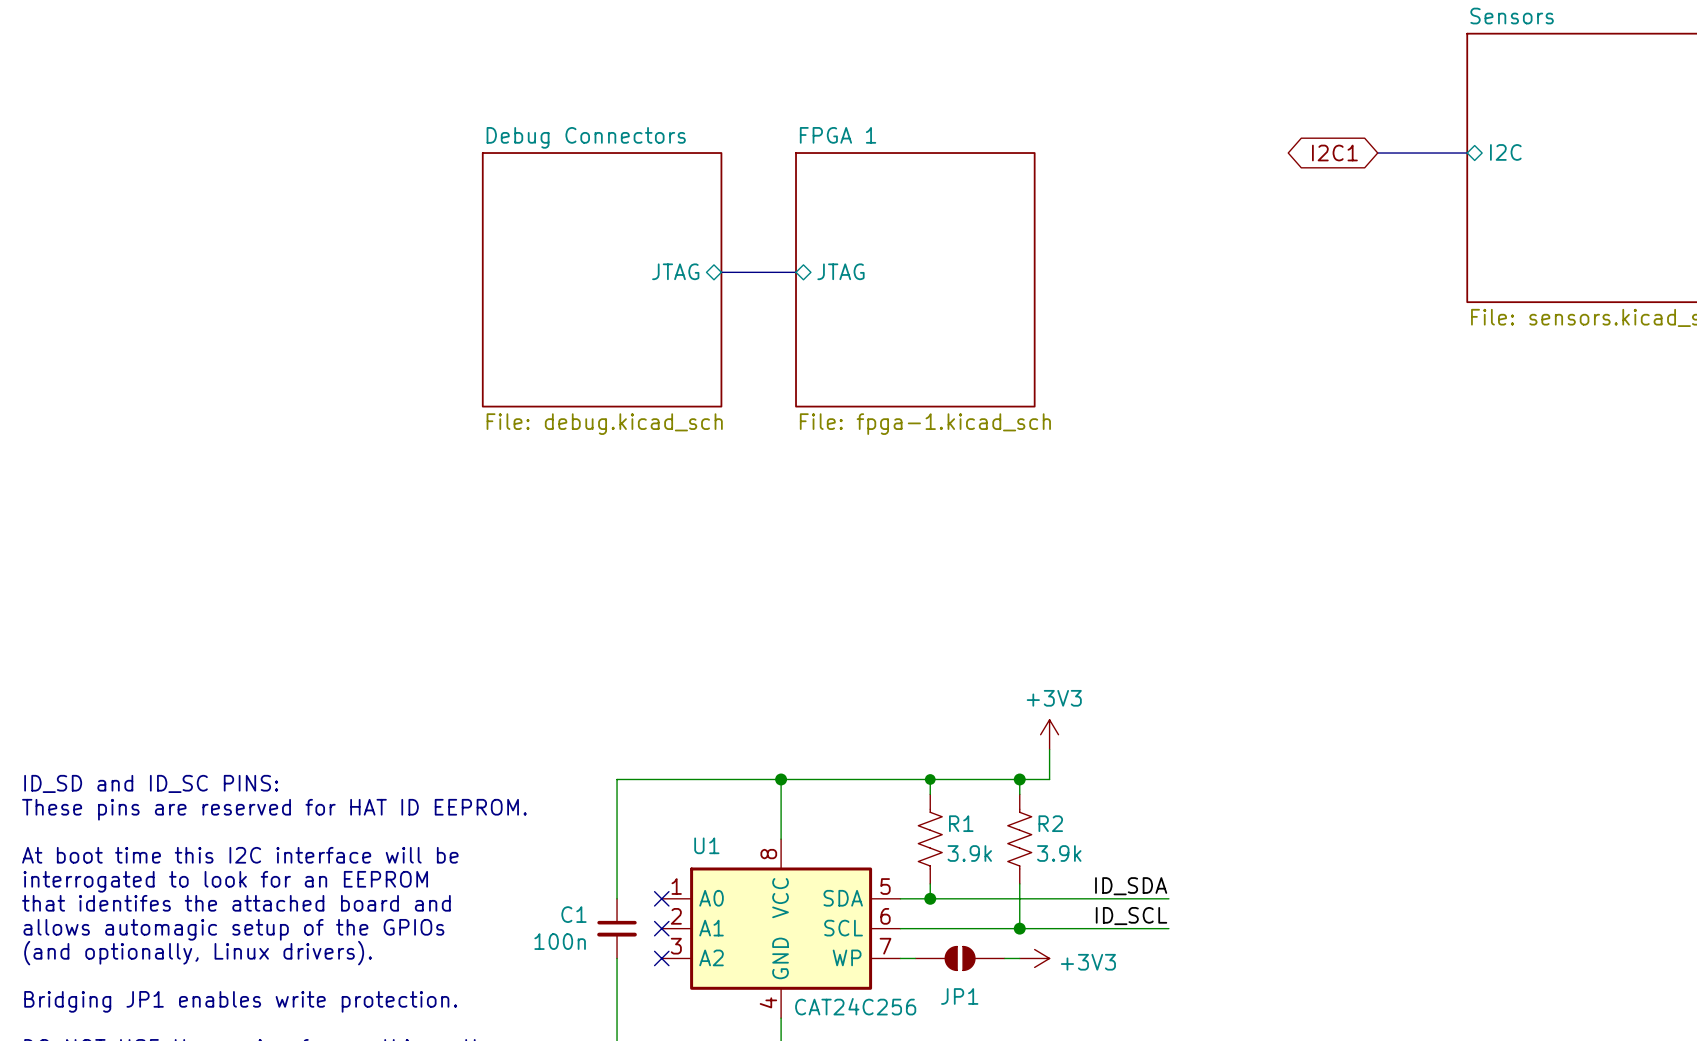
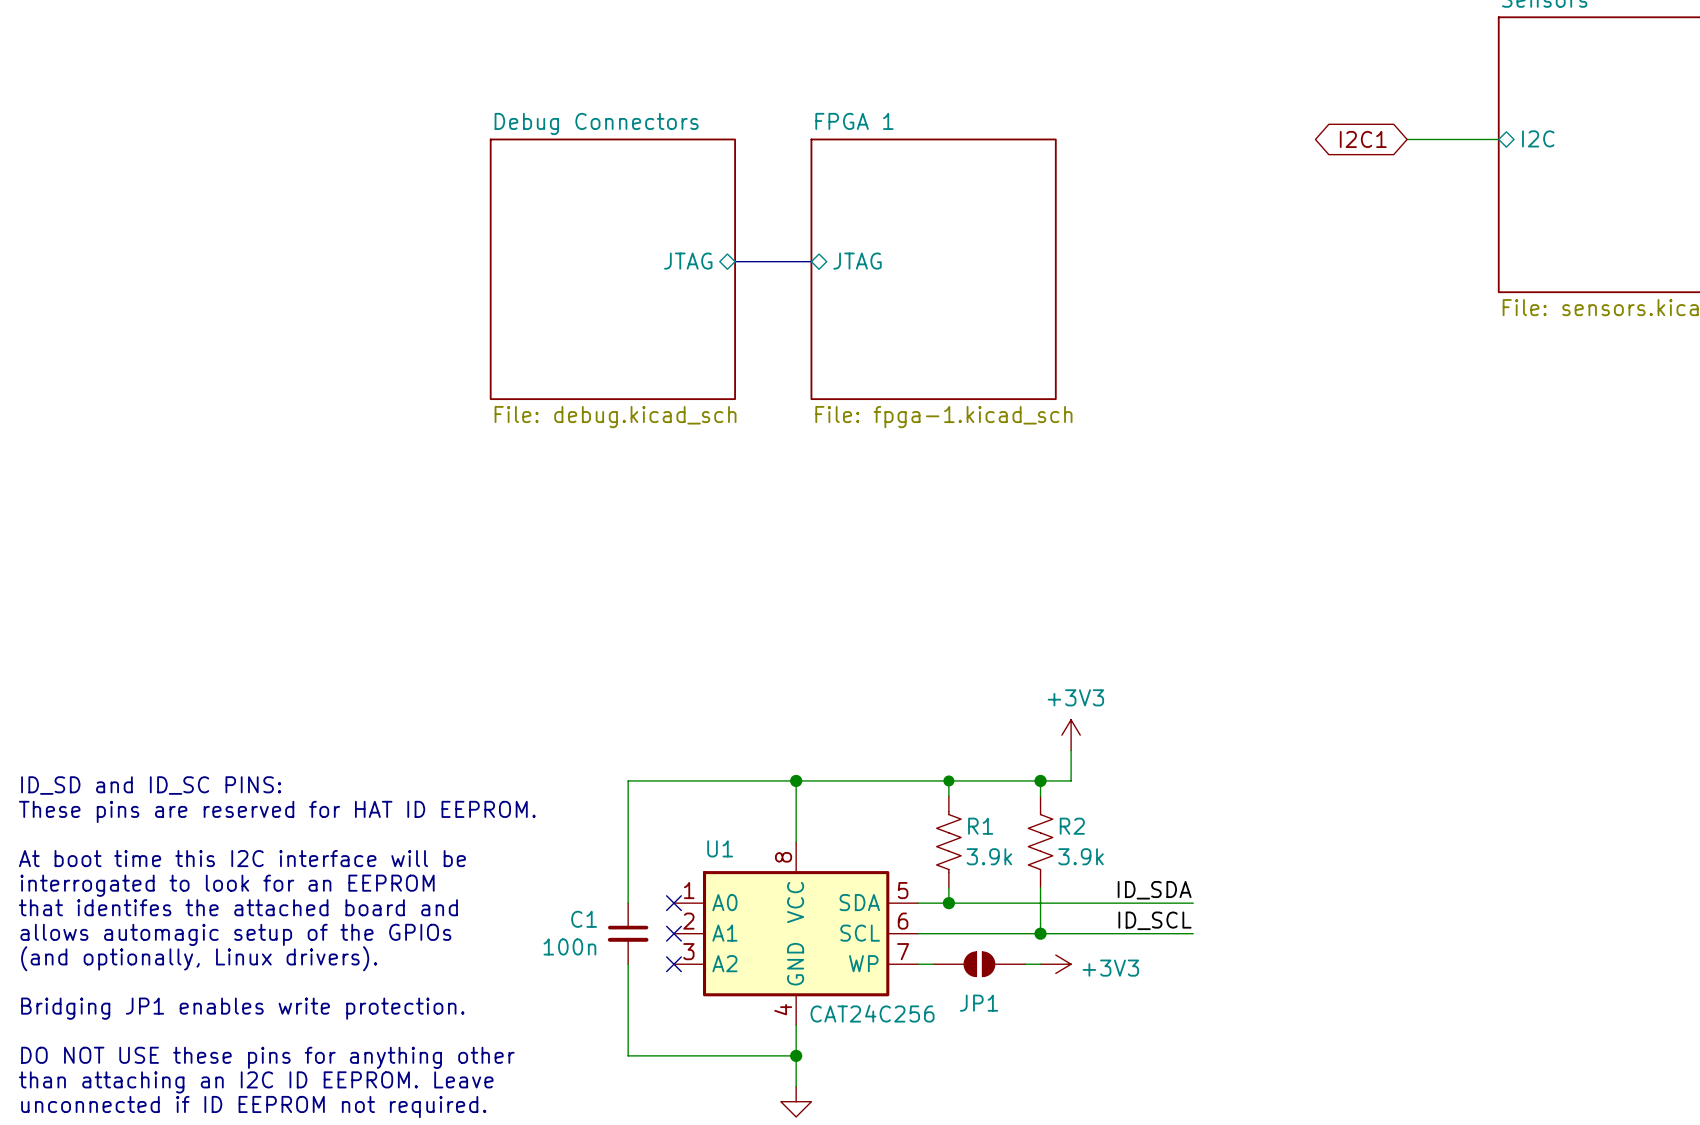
bus: (1377, 153) (1467, 153) -> none

